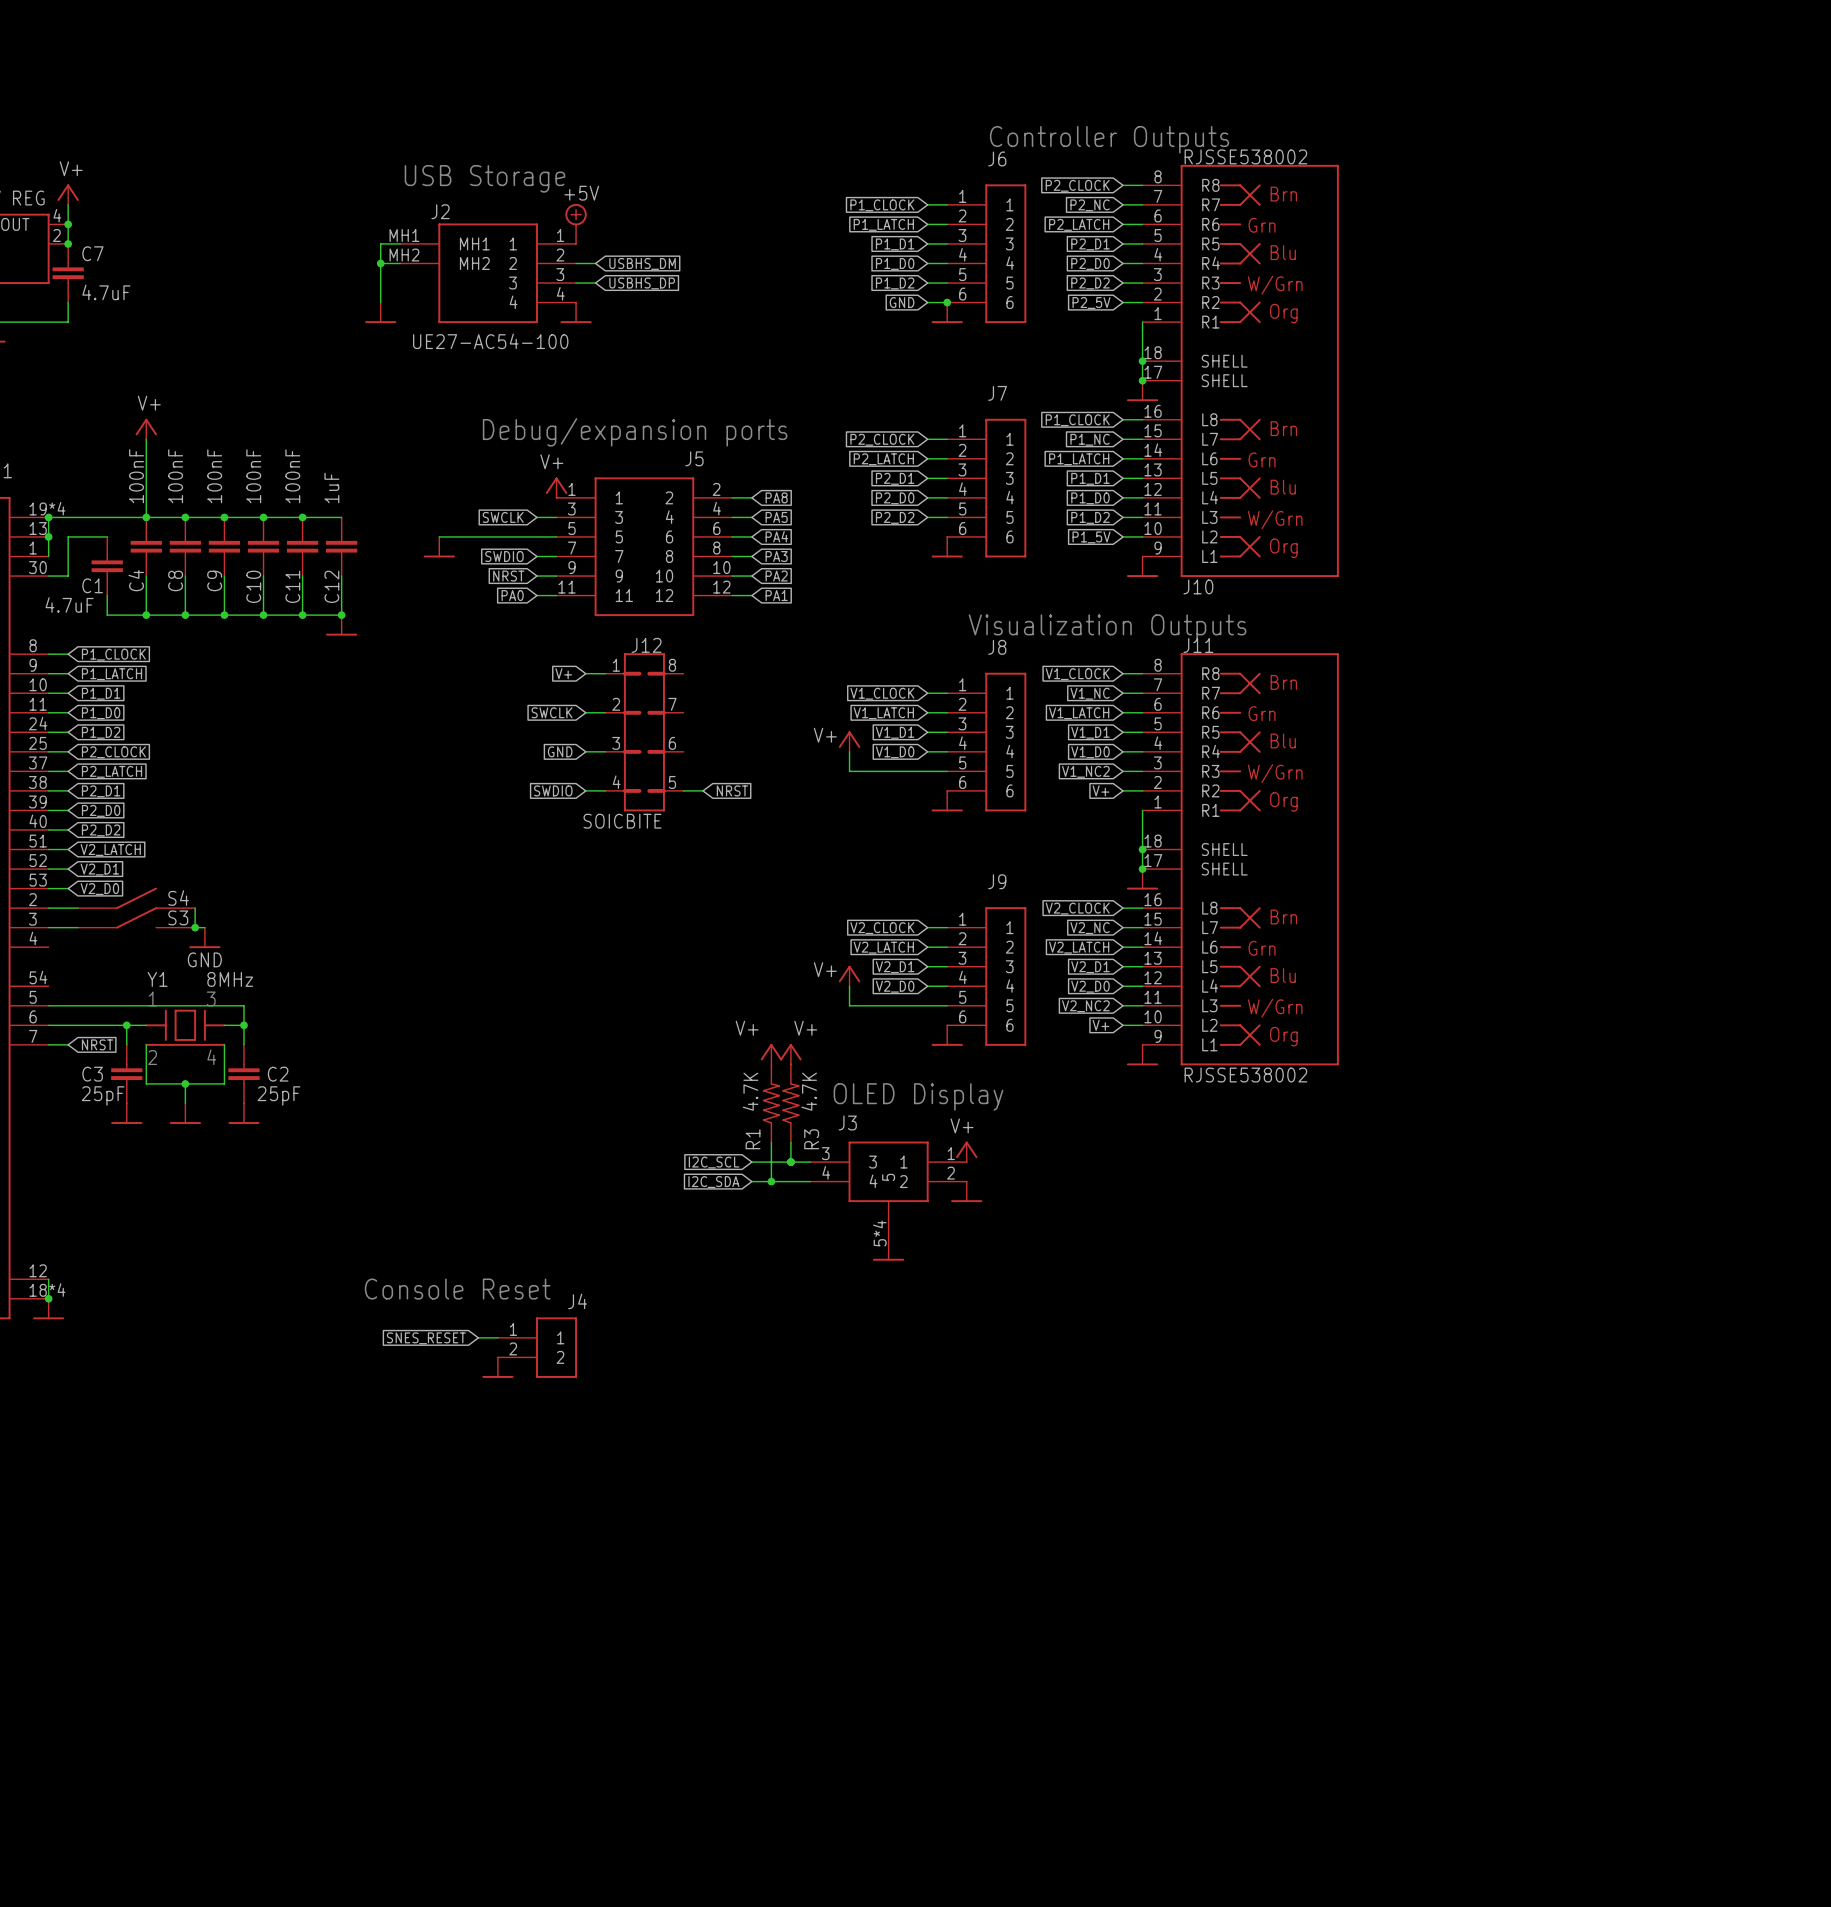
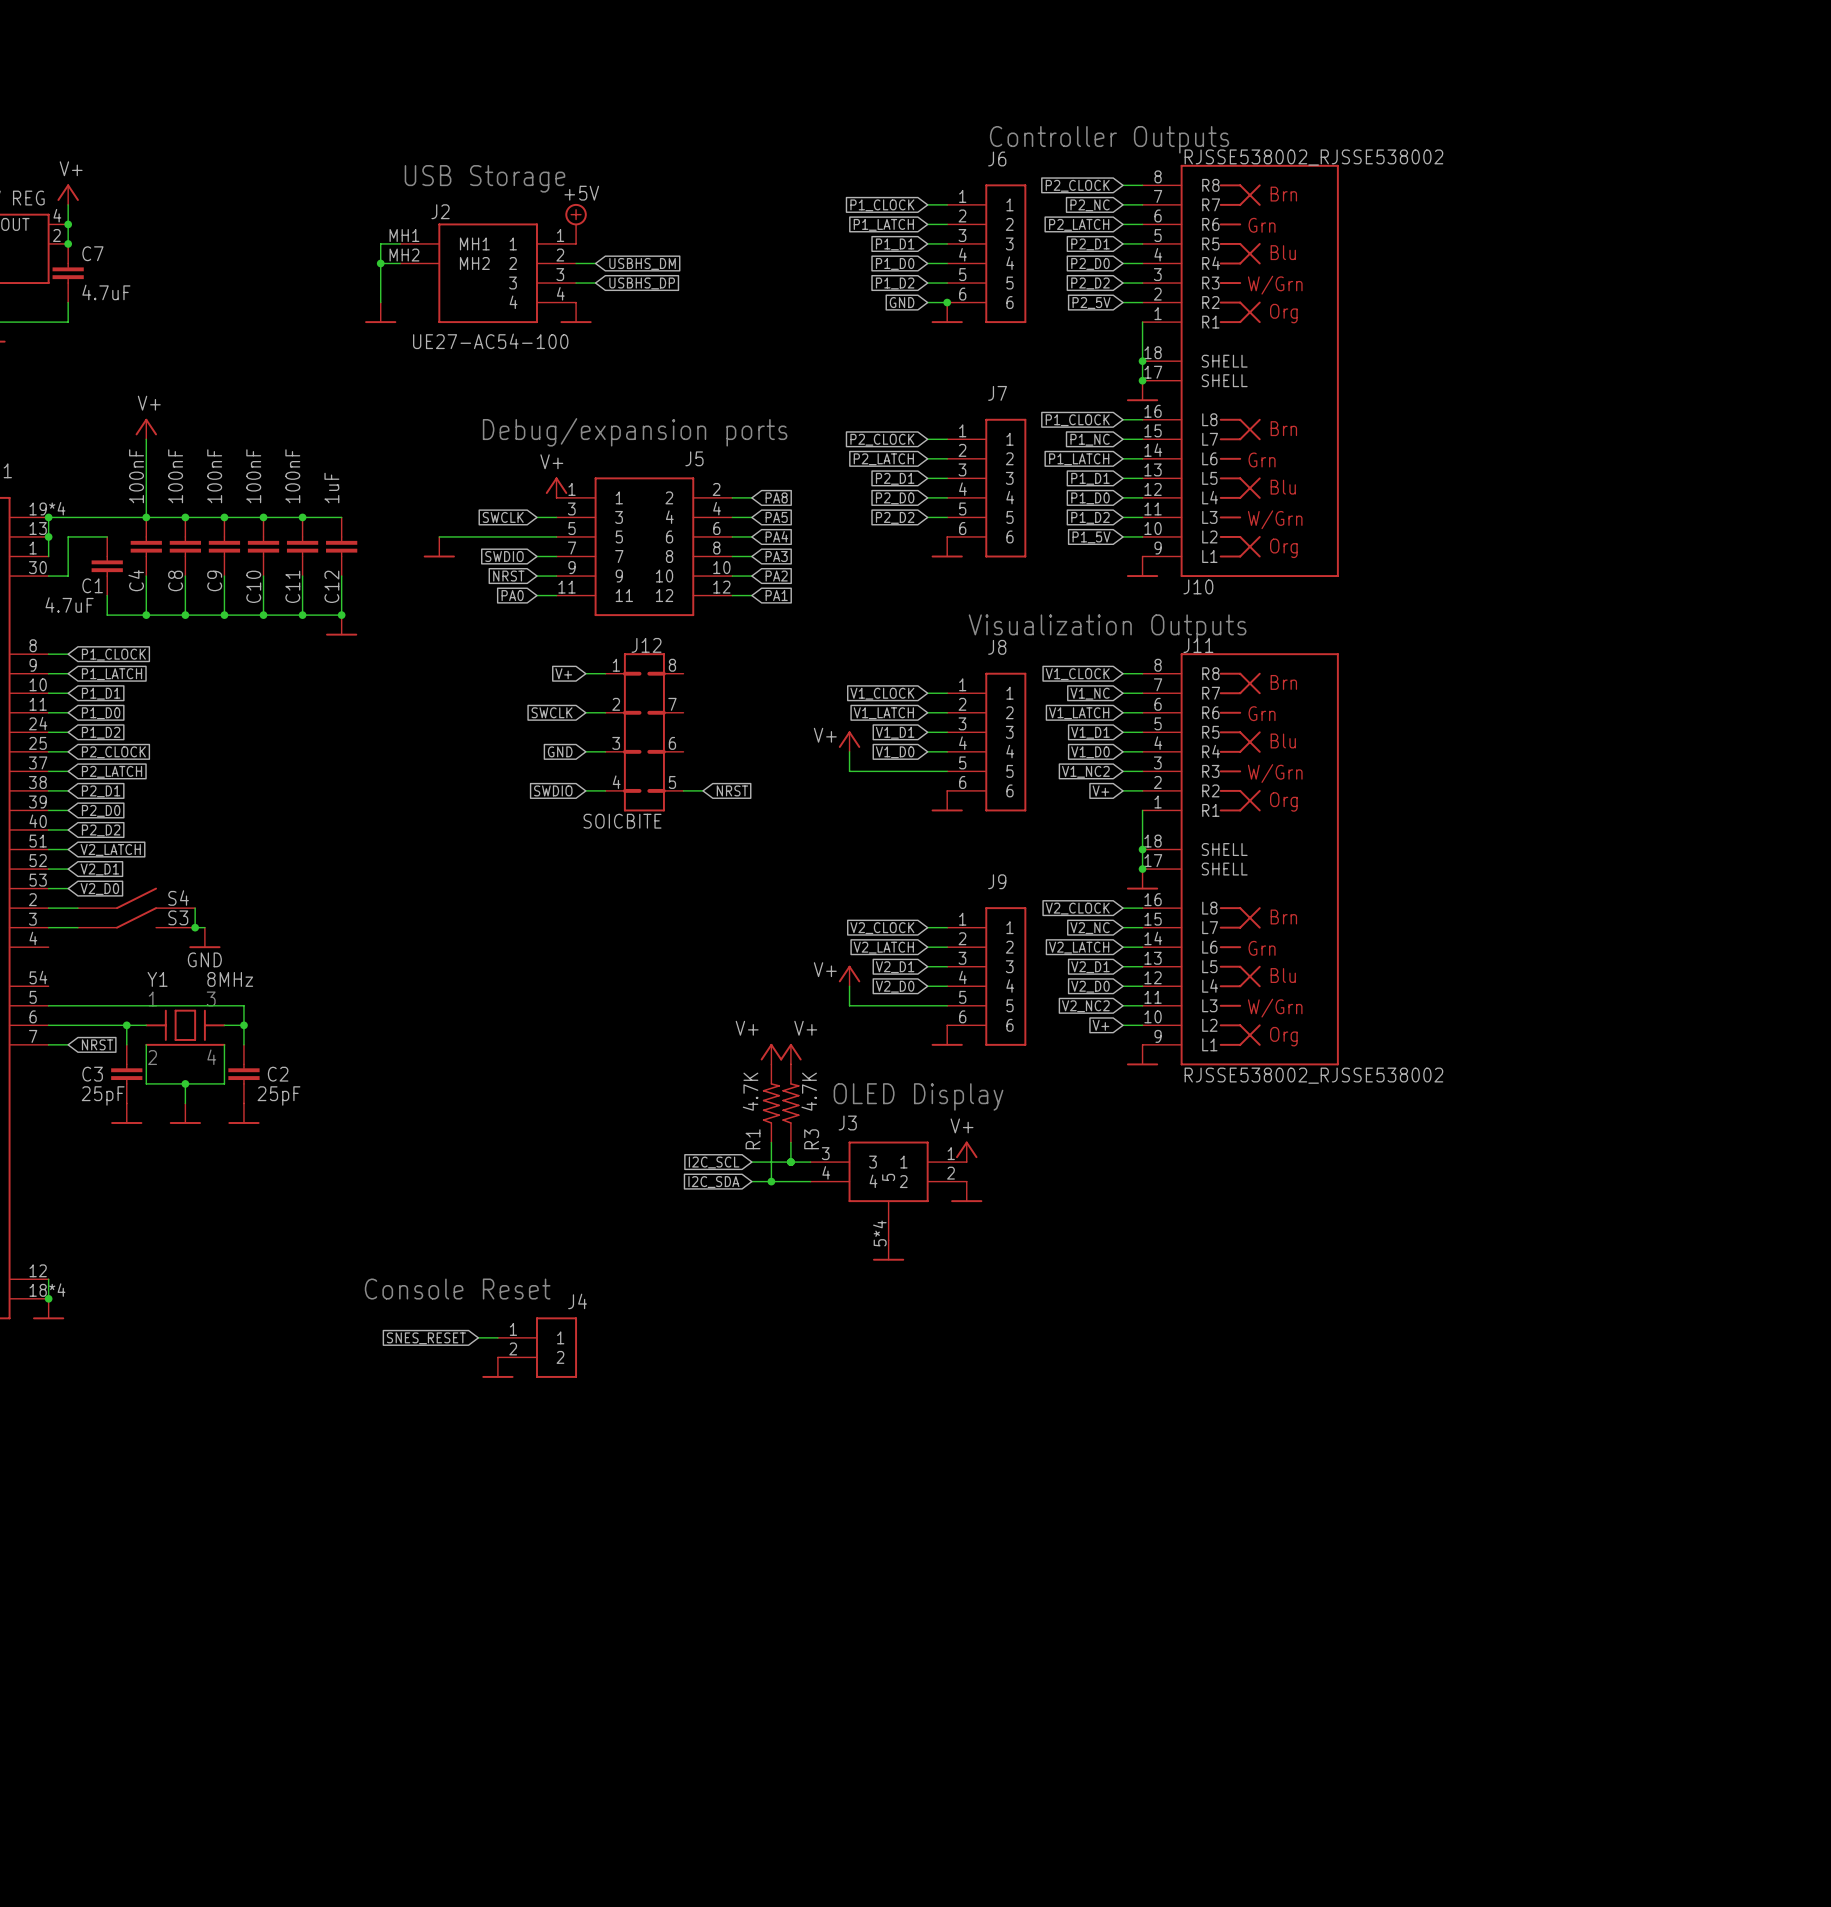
J10 value: RJSSE538002 (1245, 156) -> RJSSE538002_RJSSE538002 (1313, 157)
J11 value: RJSSE538002 (1245, 1075) -> RJSSE538002_RJSSE538002 (1313, 1075)

